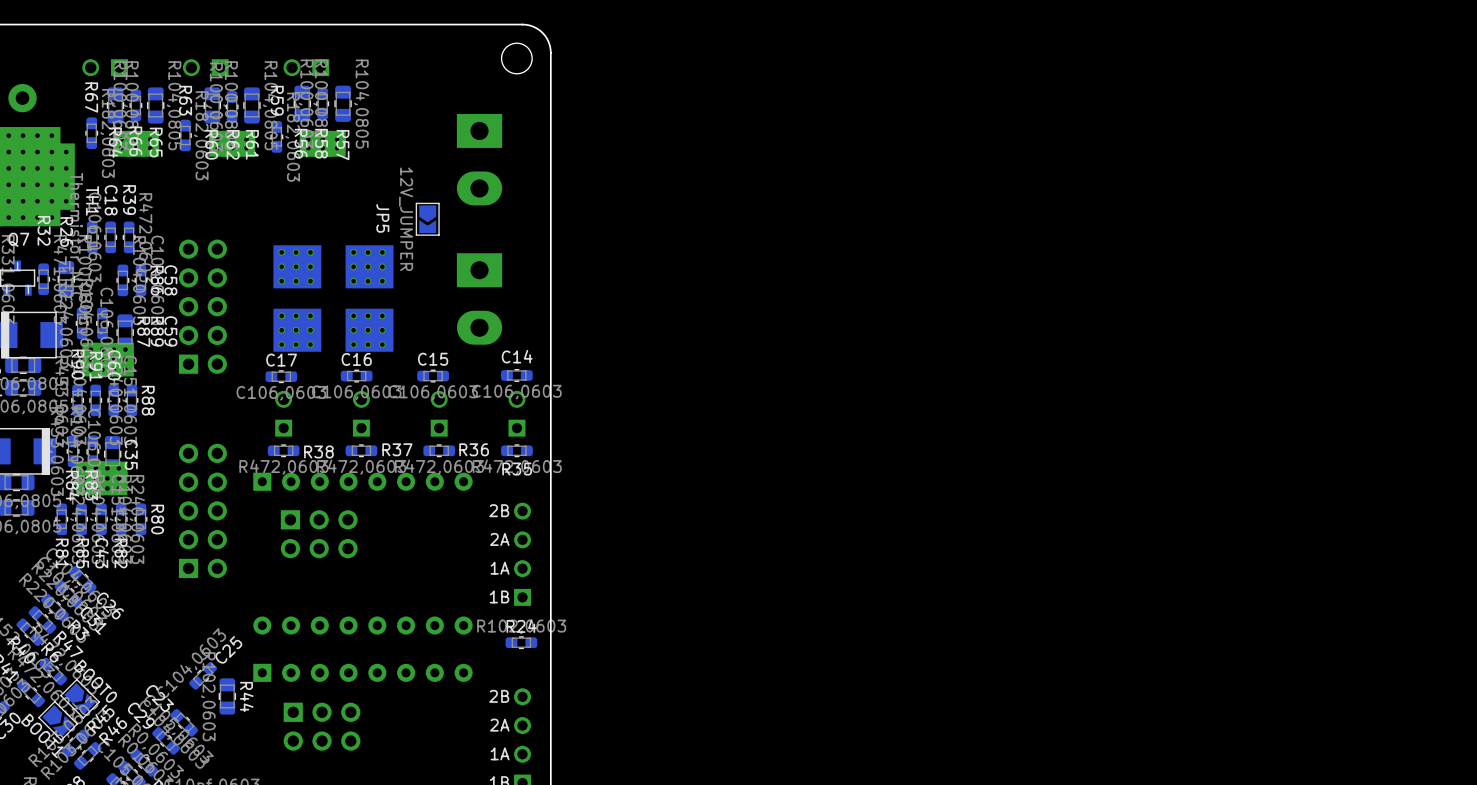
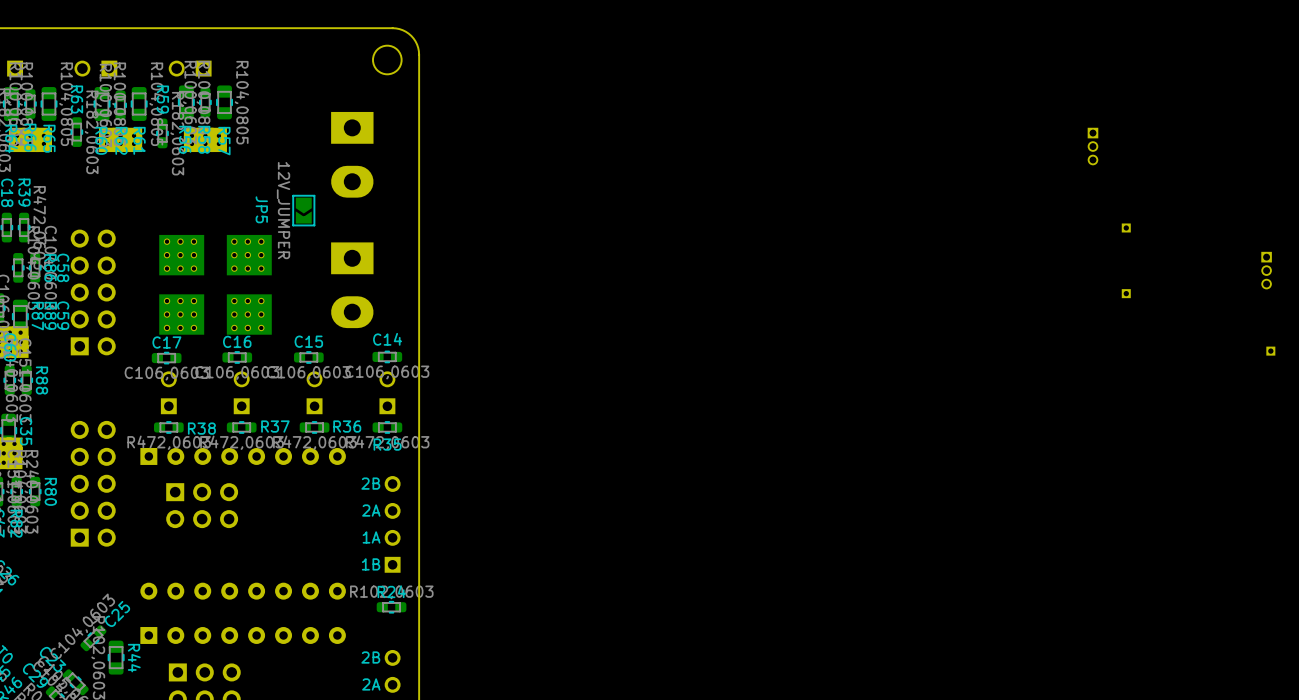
part: none -> (1092, 146)
part: none -> (1126, 227)
part: none -> (1266, 270)
part: none -> (1126, 293)
part: none -> (1270, 351)

